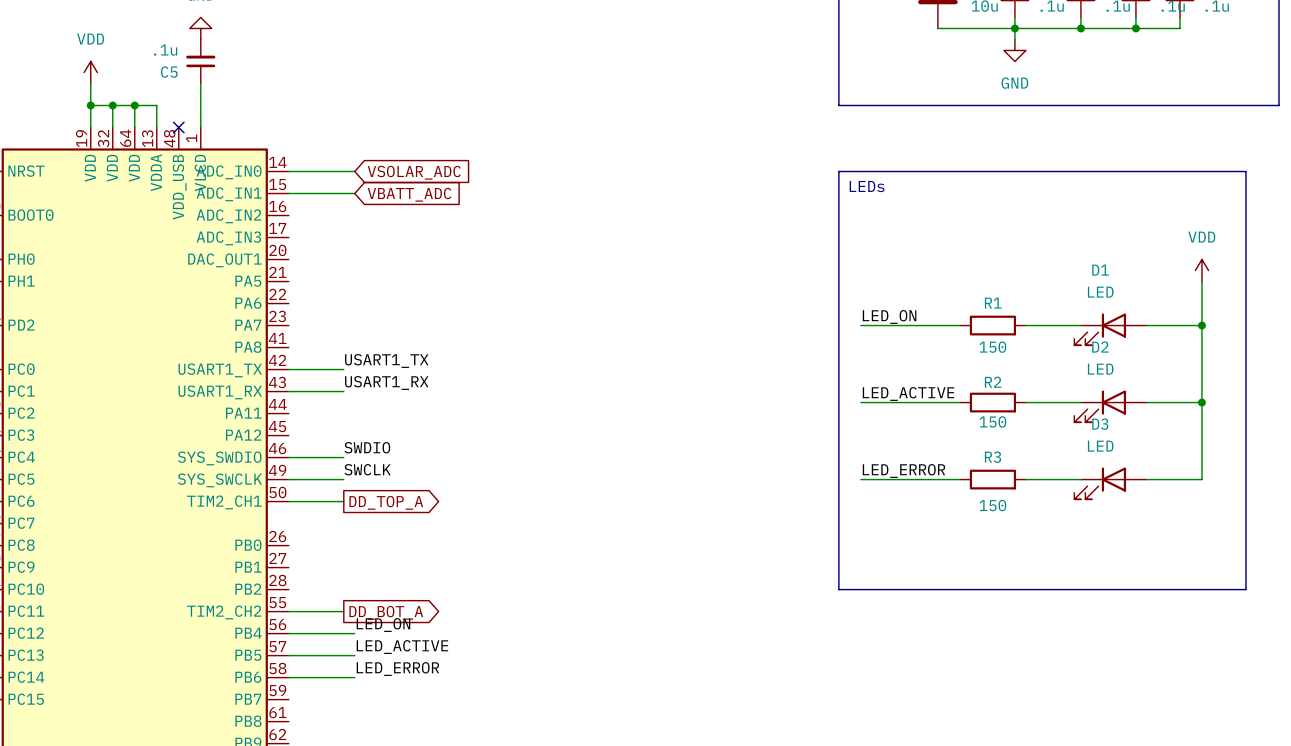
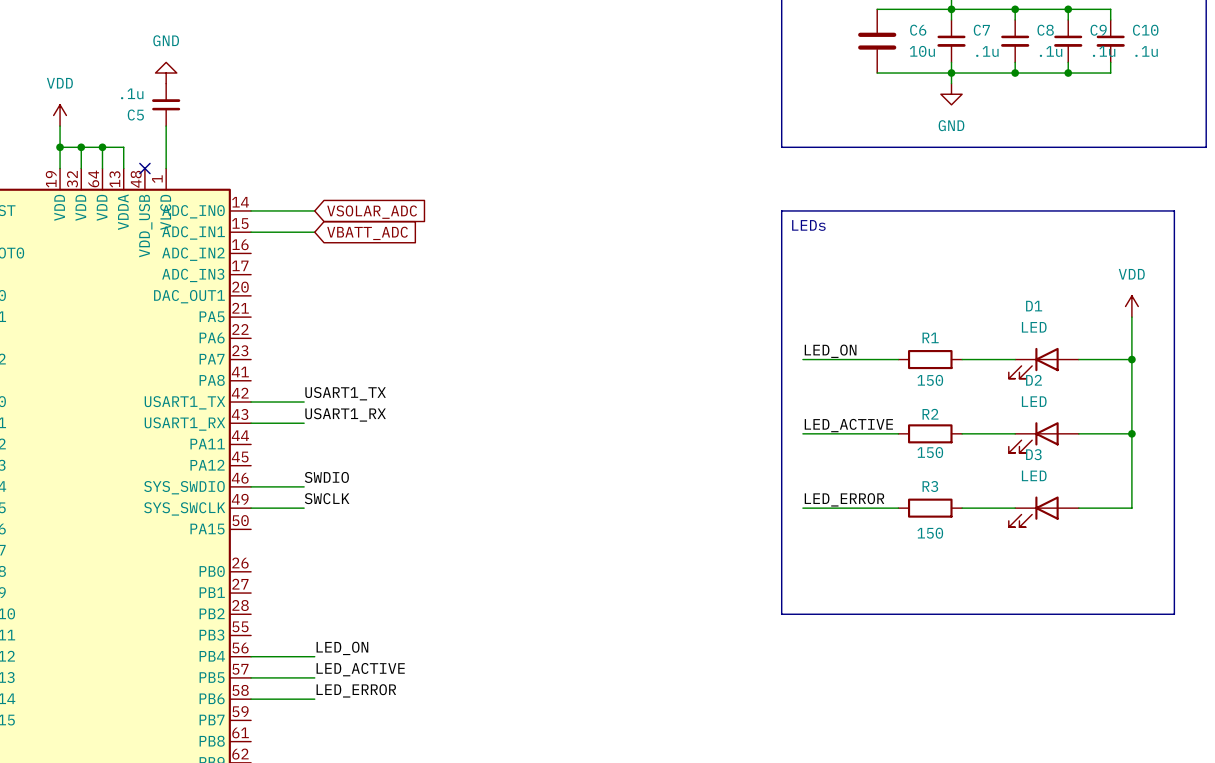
wire: (288, 501) (343, 501) -> none
part pin name: TIM2_CH1 (224, 502) -> PA15 (207, 529)
global label: DD_TOP_A (386, 502) -> none
wire: (288, 611) (343, 611) -> none
part pin name: TIM2_CH2 (224, 612) -> PB3 (211, 635)
global label: DD_BOT_A (386, 612) -> none

